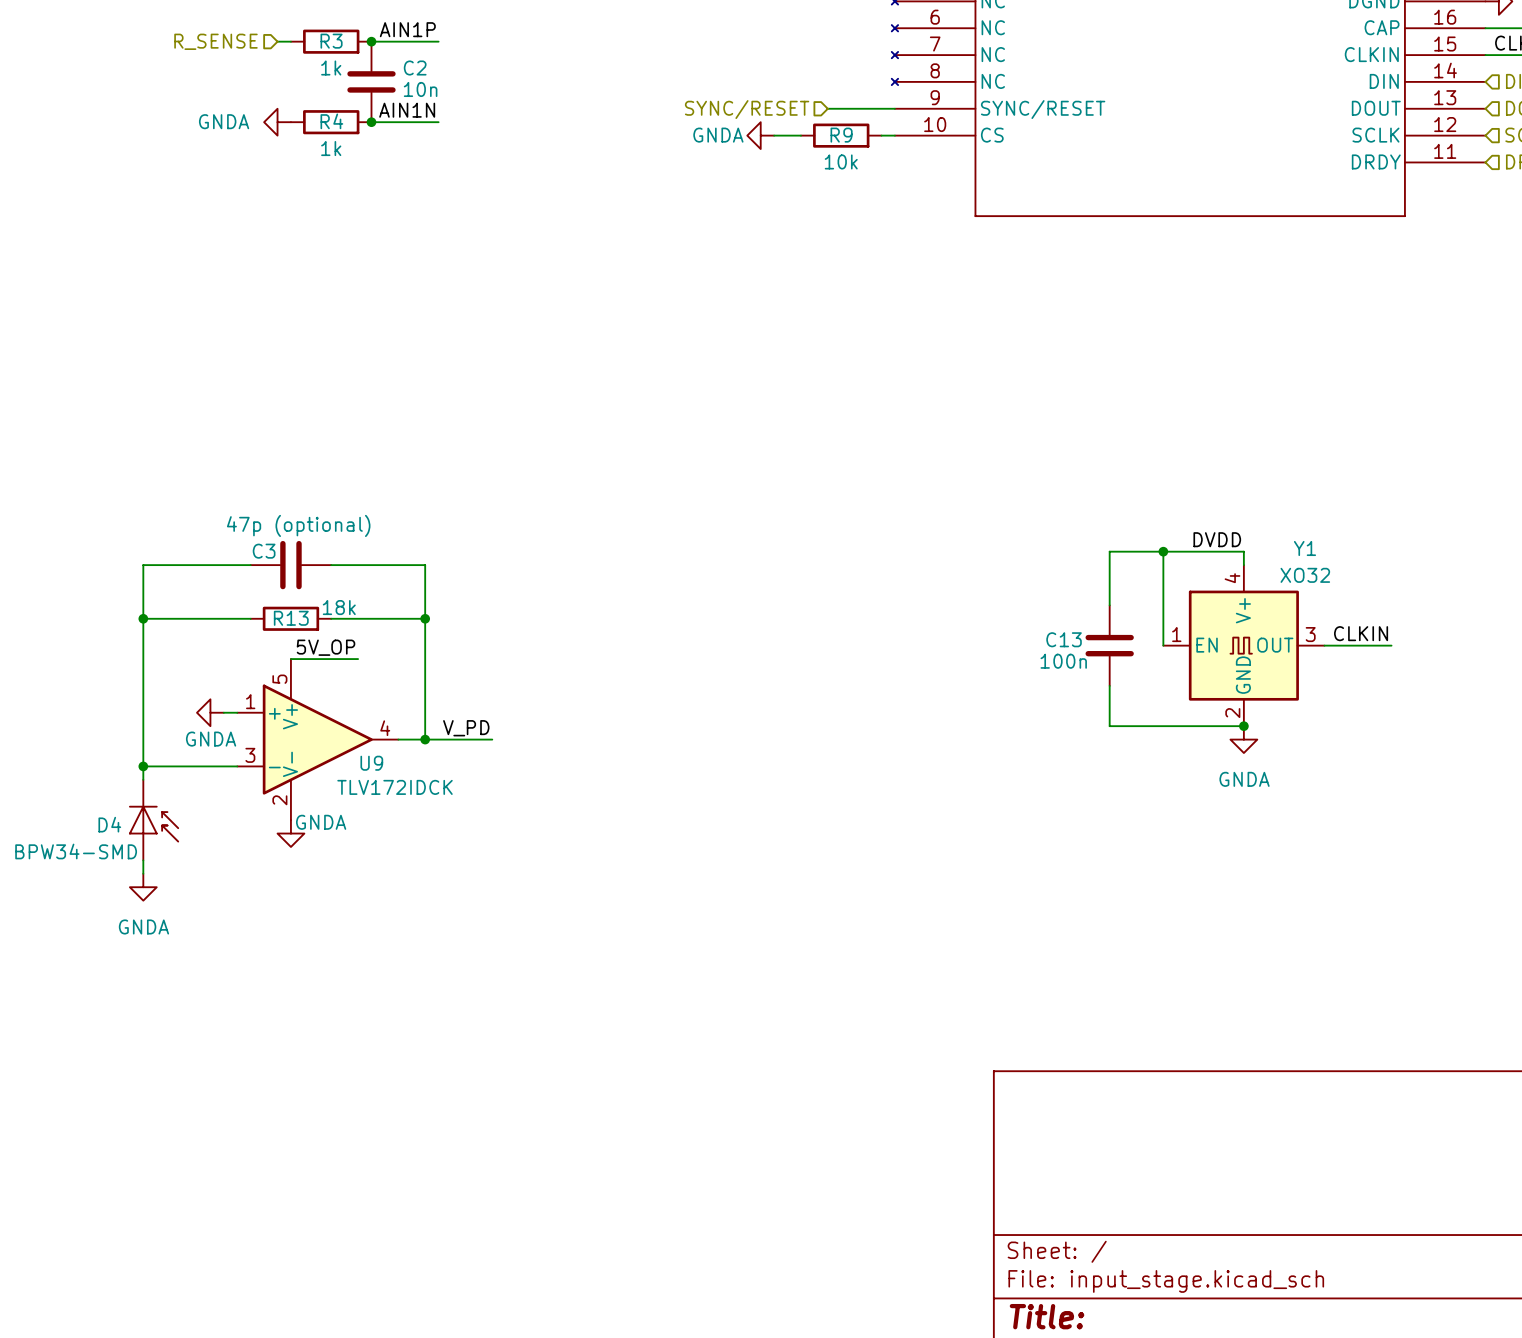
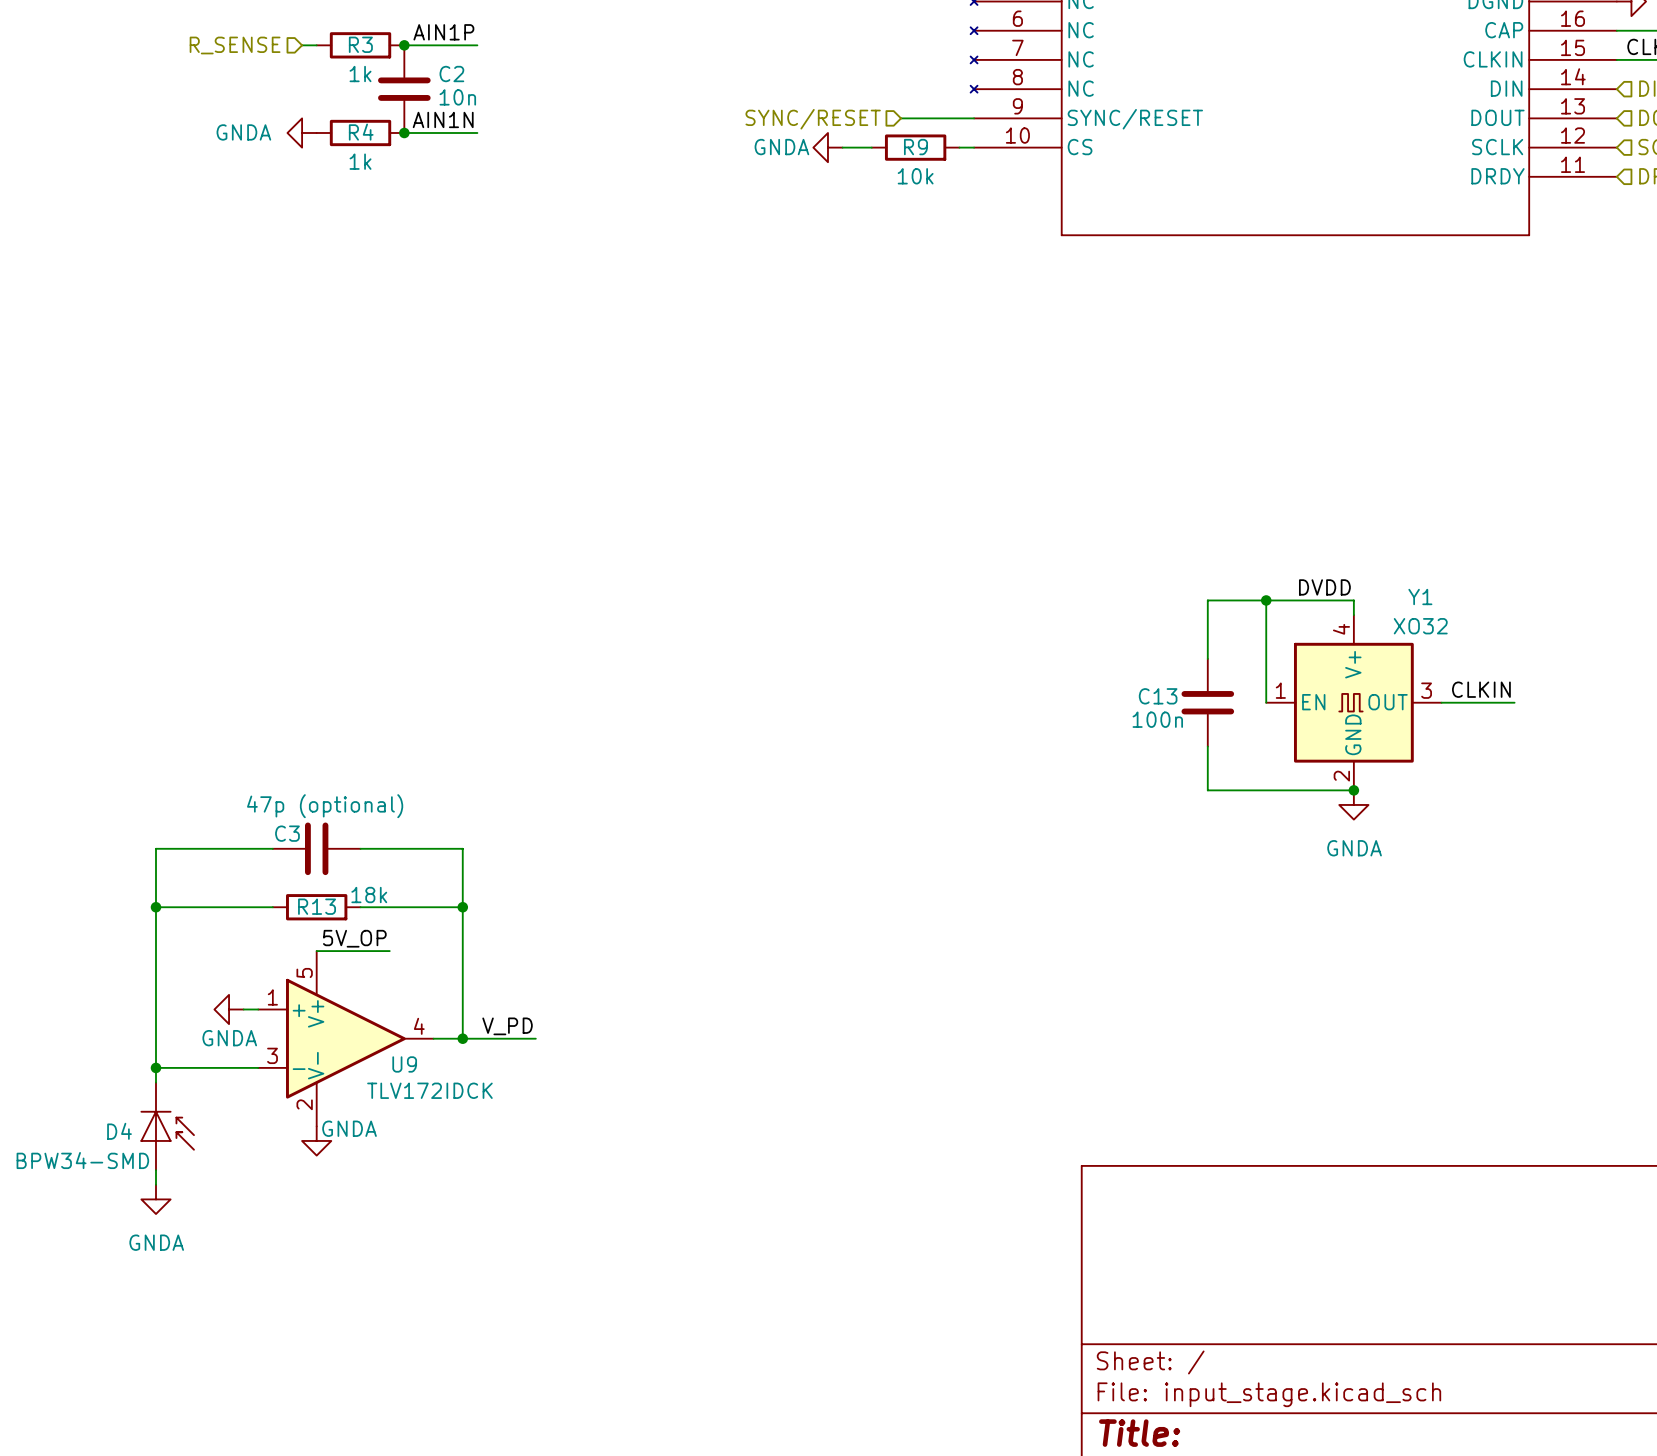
wire: (250, 565) (143, 565) (143, 779) -> none
C3 position: (290, 565) -> (316, 848)
wire: (331, 565) (425, 565) (425, 739) -> (360, 848) (462, 848) (462, 1038)
wire: (143, 618) (250, 618) -> (156, 907) (272, 907)
junction: (143, 618) -> none
R13 position: (290, 618) -> (316, 907)
wire: (331, 618) (425, 618) -> (360, 907) (462, 907)
junction: (425, 618) -> none
label position: 5V_OP (326, 647) -> 5V_OP (354, 938)
wire: (290, 659) (358, 659) -> (316, 951) (389, 951)
power symbol: GNDA (210, 712) -> none
wire: (223, 712) (237, 712) -> (243, 1009) (258, 1009)
label position: V_PD (466, 728) -> V_PD (507, 1026)
U9 position: (317, 739) -> (345, 1038)
wire: (398, 739) (492, 739) -> (433, 1038) (535, 1038)
junction: (425, 739) -> none
wire: (143, 766) (237, 766) -> (156, 1067) (258, 1067)
junction: (143, 766) -> none
wire: none -> (272, 848) (156, 848) (156, 936)
D4 position: (153, 820) -> (167, 1126)
junction: none -> (156, 907)
power symbol: GNDA (290, 833) -> none
junction: none -> (462, 907)
wire: none -> (156, 951) (156, 1082)
power symbol: GNDA (143, 887) -> none
power symbol: none -> GNDA (229, 1009)
junction: none -> (462, 1038)
junction: none -> (156, 1067)
power symbol: none -> GNDA (316, 1140)
wire: none -> (156, 1170) (156, 1184)
power symbol: none -> GNDA (156, 1199)

